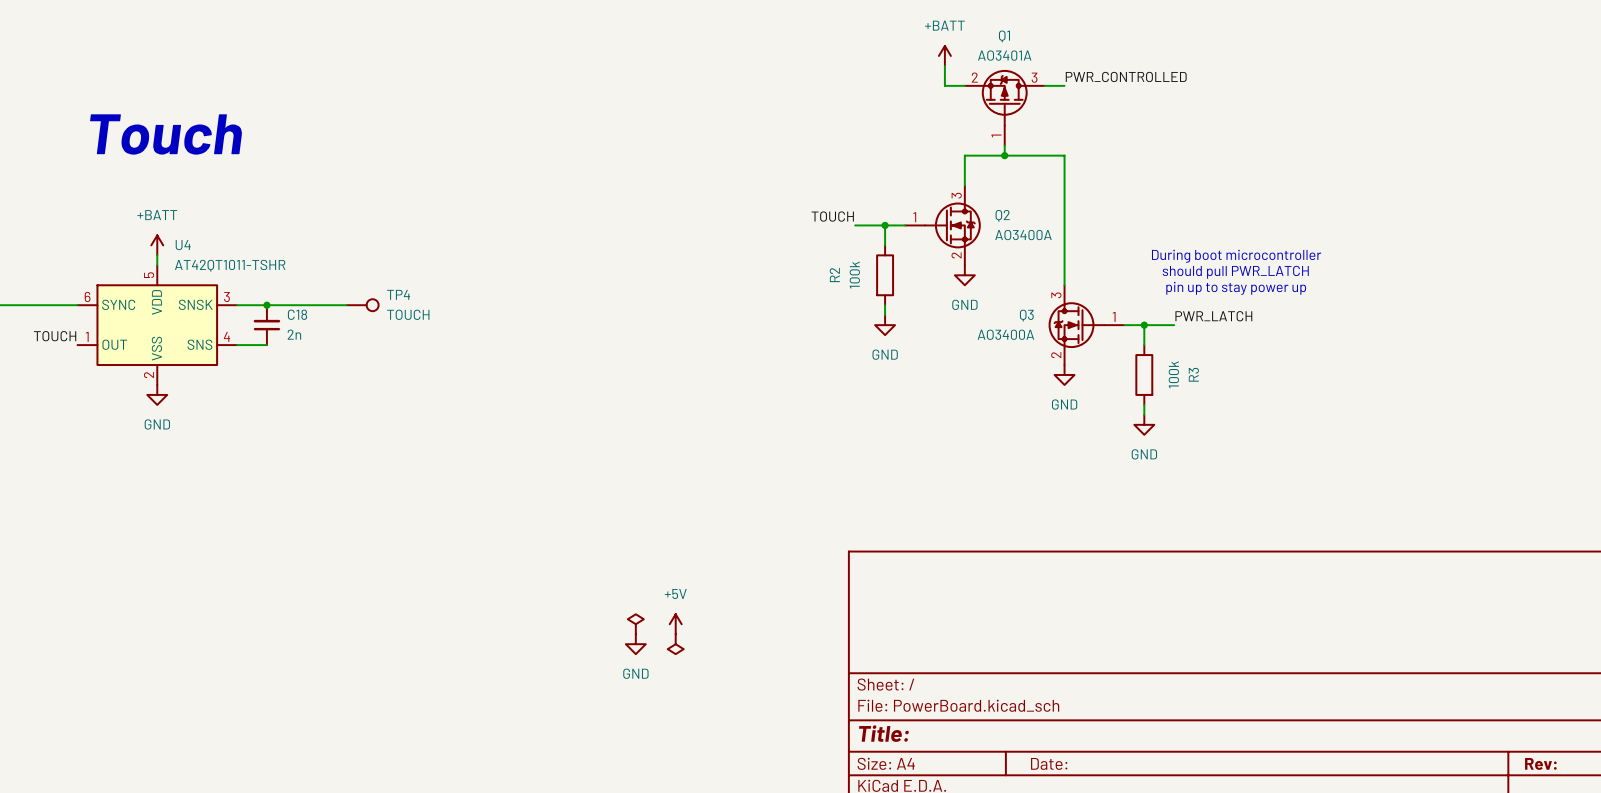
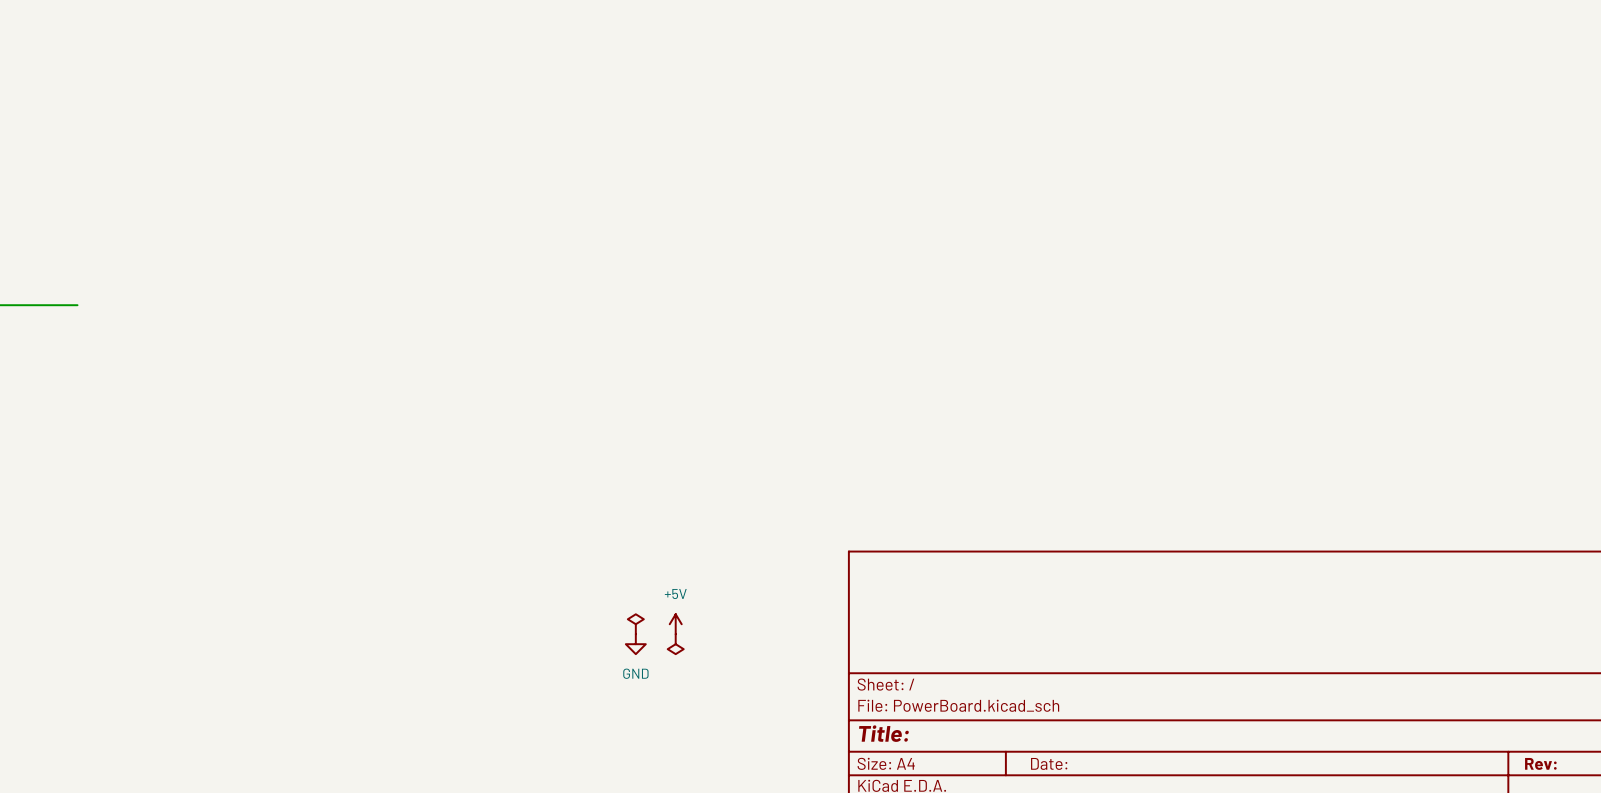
power symbol: +BATT (944, 55) -> none
wire: (944, 65) (944, 85) (964, 85) -> none
label: PWR_CONTROLLED (1126, 76) -> none
wire: (1044, 85) (1064, 85) -> none
Q1: AO3401A (1004, 107) -> none
text: Touch (166, 134) -> none
wire: (1004, 145) (1004, 155) -> none
junction: (1004, 155) -> none
wire: (964, 185) (964, 155) (1064, 155) (1064, 285) -> none
label: TOUCH (832, 216) -> none
wire: (855, 225) (905, 225) -> none
wire: (885, 225) (885, 245) -> none
junction: (885, 225) -> none
Q2: AO3400A (942, 225) -> none
power symbol: +BATT (157, 245) -> none
wire: (157, 255) (157, 265) -> none
text: During boot microcontroller (1236, 256) -> none
text: should pull PWR_LATCH (1235, 272) -> none
R2: 100k (885, 275) -> none
power symbol: GND (964, 275) -> none
text: pin up to stay power up (1236, 288) -> none
wire: (237, 305) (346, 305) -> none
junction: (266, 305) -> none
TP4: TOUCH (362, 305) -> none
wire: (885, 305) (885, 315) -> none
label: PWR_LATCH (1213, 316) -> none
U4: AT42QT1011-TSHR (157, 325) -> none
C18: 2n (266, 325) -> none
power symbol: GND (885, 325) -> none
Q3: AO3400A (1086, 325) -> none
wire: (1124, 325) (1174, 325) -> none
wire: (1144, 325) (1144, 345) -> none
junction: (1144, 325) -> none
label: TOUCH (55, 336) -> none
wire: (237, 345) (266, 345) -> none
power symbol: GND (1064, 374) -> none
R3: 100k (1144, 374) -> none
power symbol: GND (157, 394) -> none
wire: (1144, 404) (1144, 414) -> none
power symbol: GND (1144, 424) -> none

